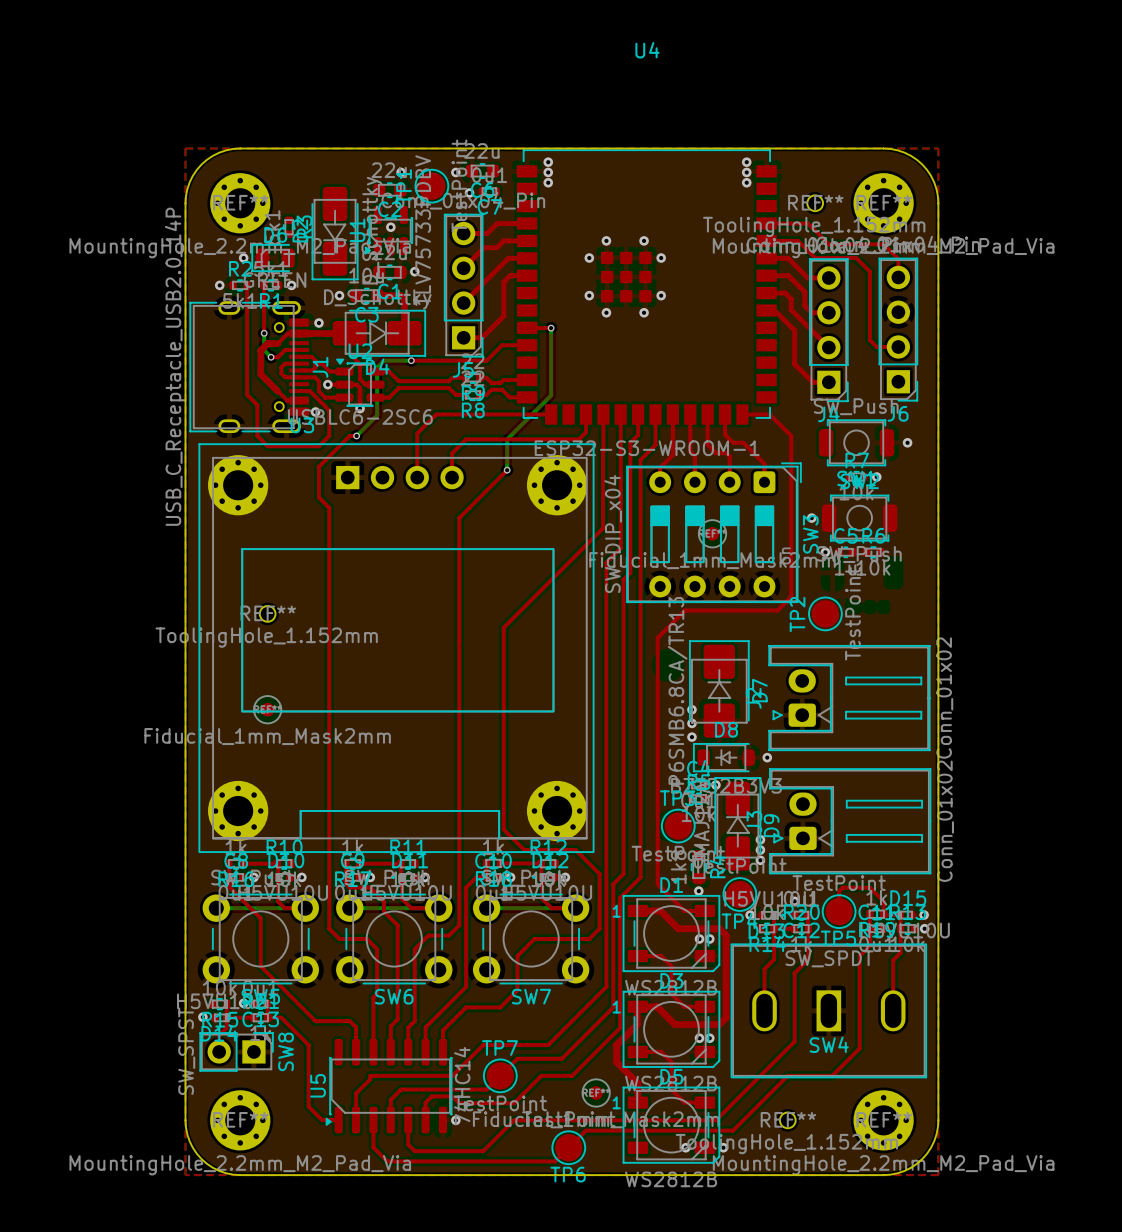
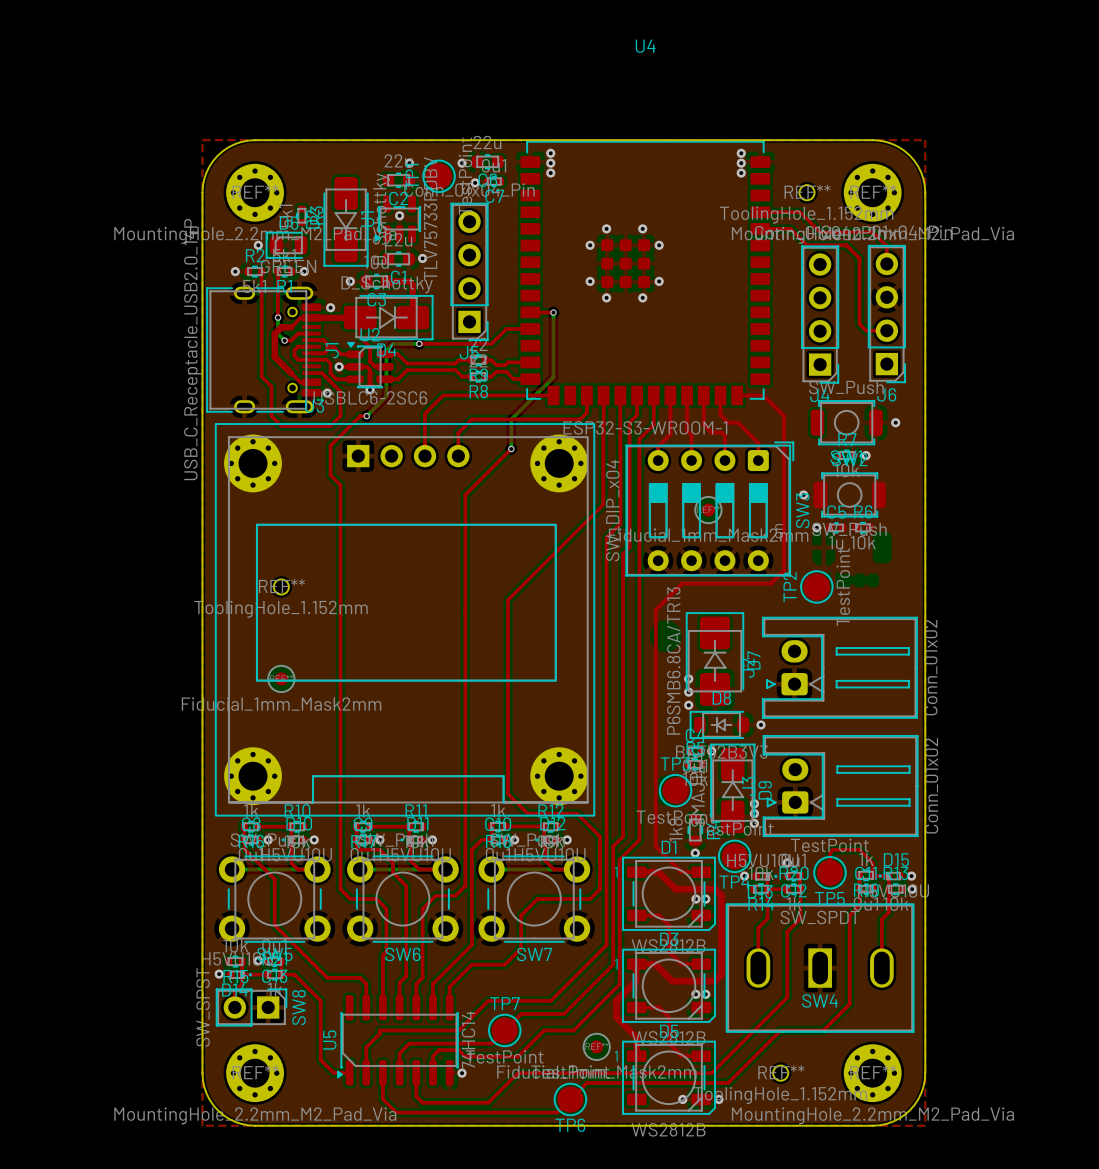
top track: (527, 223) (497, 223) (487, 233) (463, 233) -> none
top track: (527, 240) (503, 240) (496, 247) (484, 247) (463, 268) -> none
top track: (527, 258) (508, 258) (463, 303) -> none
top track: (766, 258) (788, 258) (807, 277) (828, 277) -> none
top track: (527, 275) (510, 275) (503, 281) (503, 316) (482, 337) (463, 337) -> none
top track: (766, 275) (788, 275) (804, 292) (804, 305) (811, 312) (828, 312) -> none
top track: (766, 293) (785, 293) (791, 299) (791, 309) (828, 347) -> none
top track: (766, 310) (774, 310) (794, 330) (794, 364) (812, 382) (828, 382) -> none

